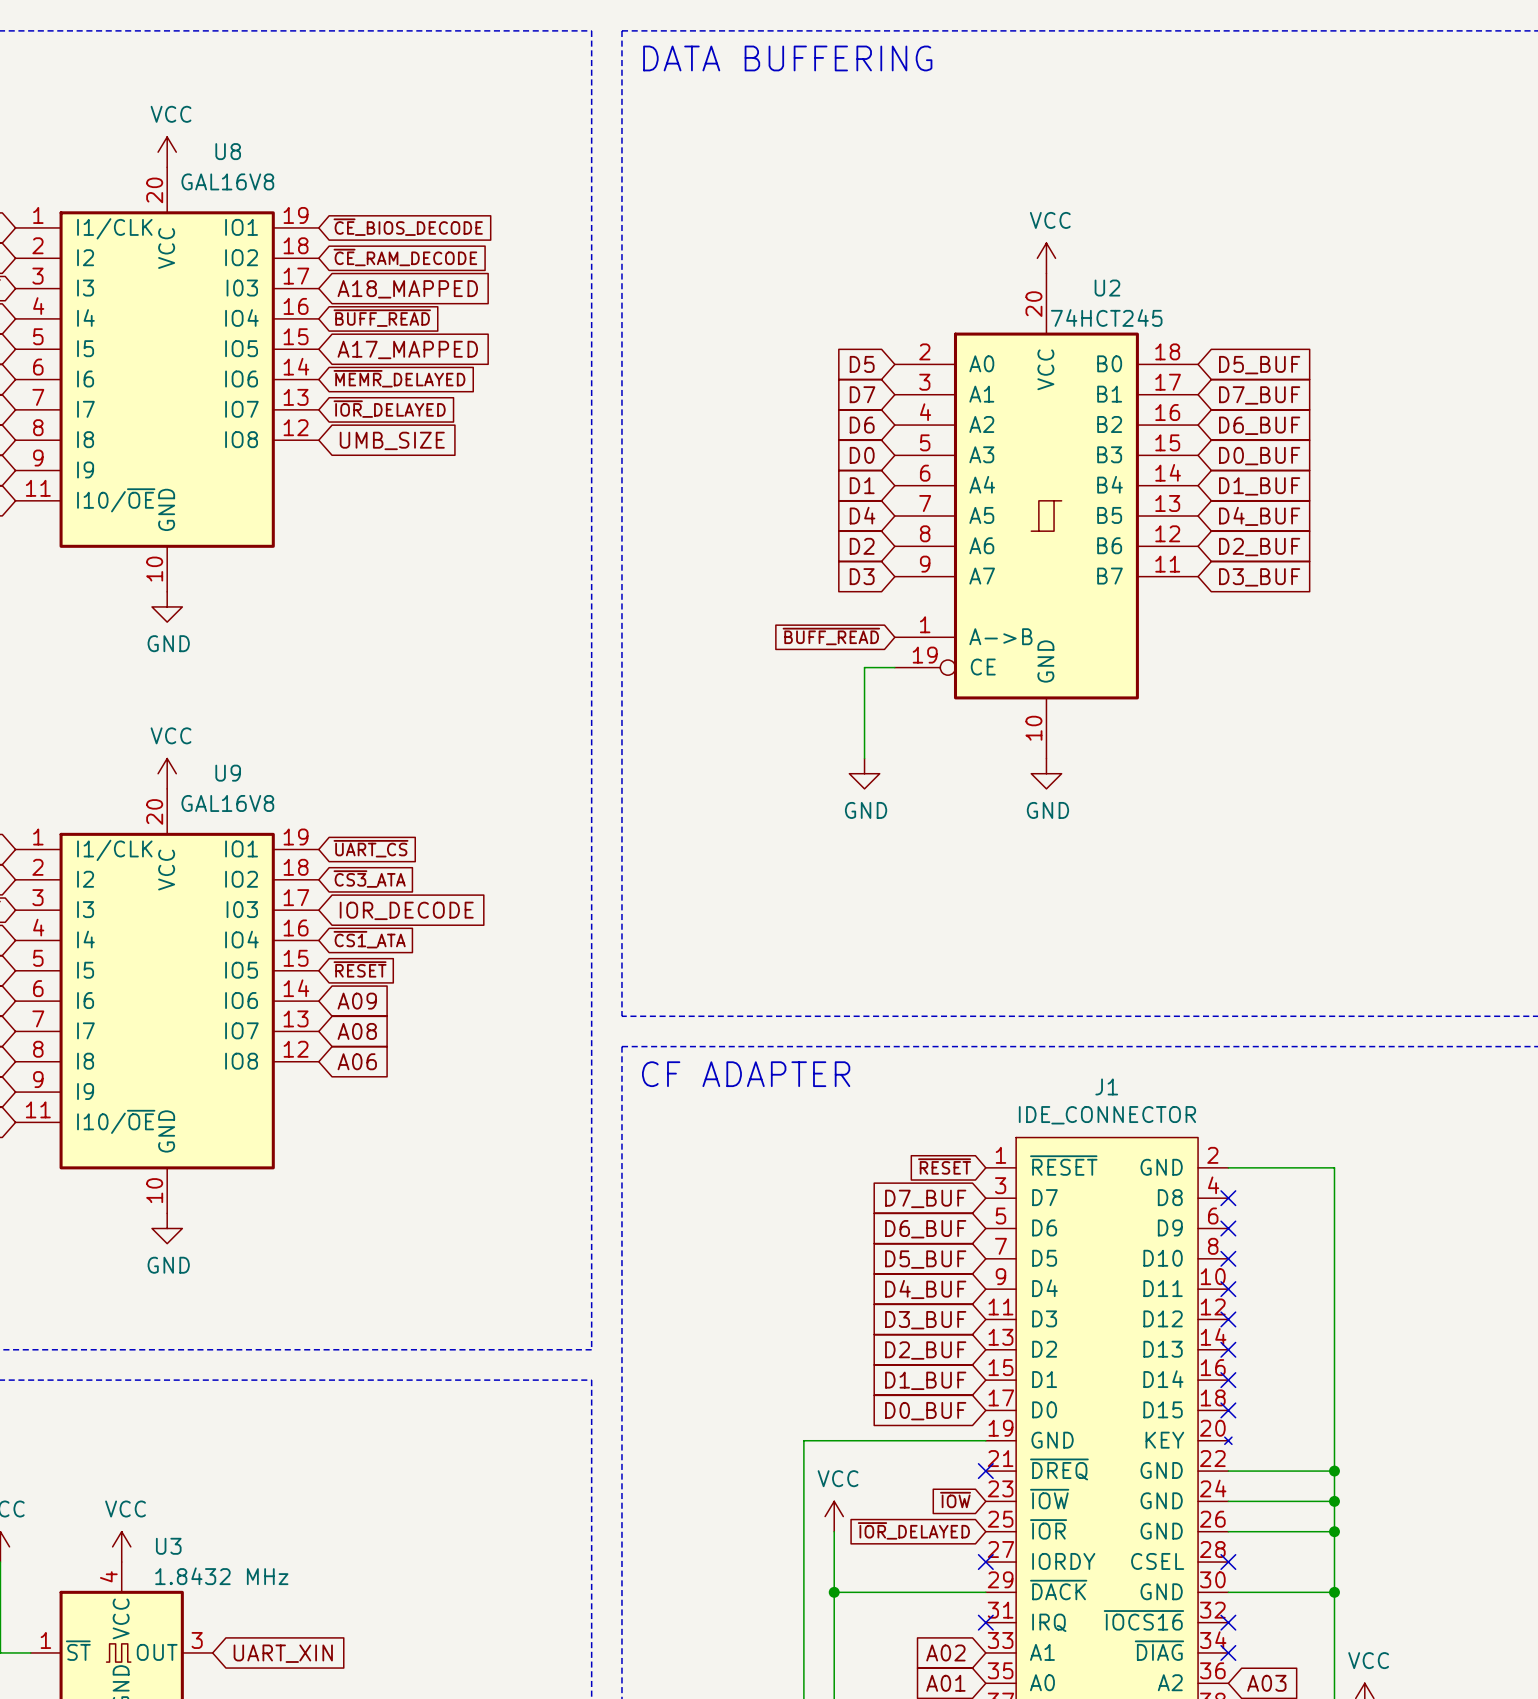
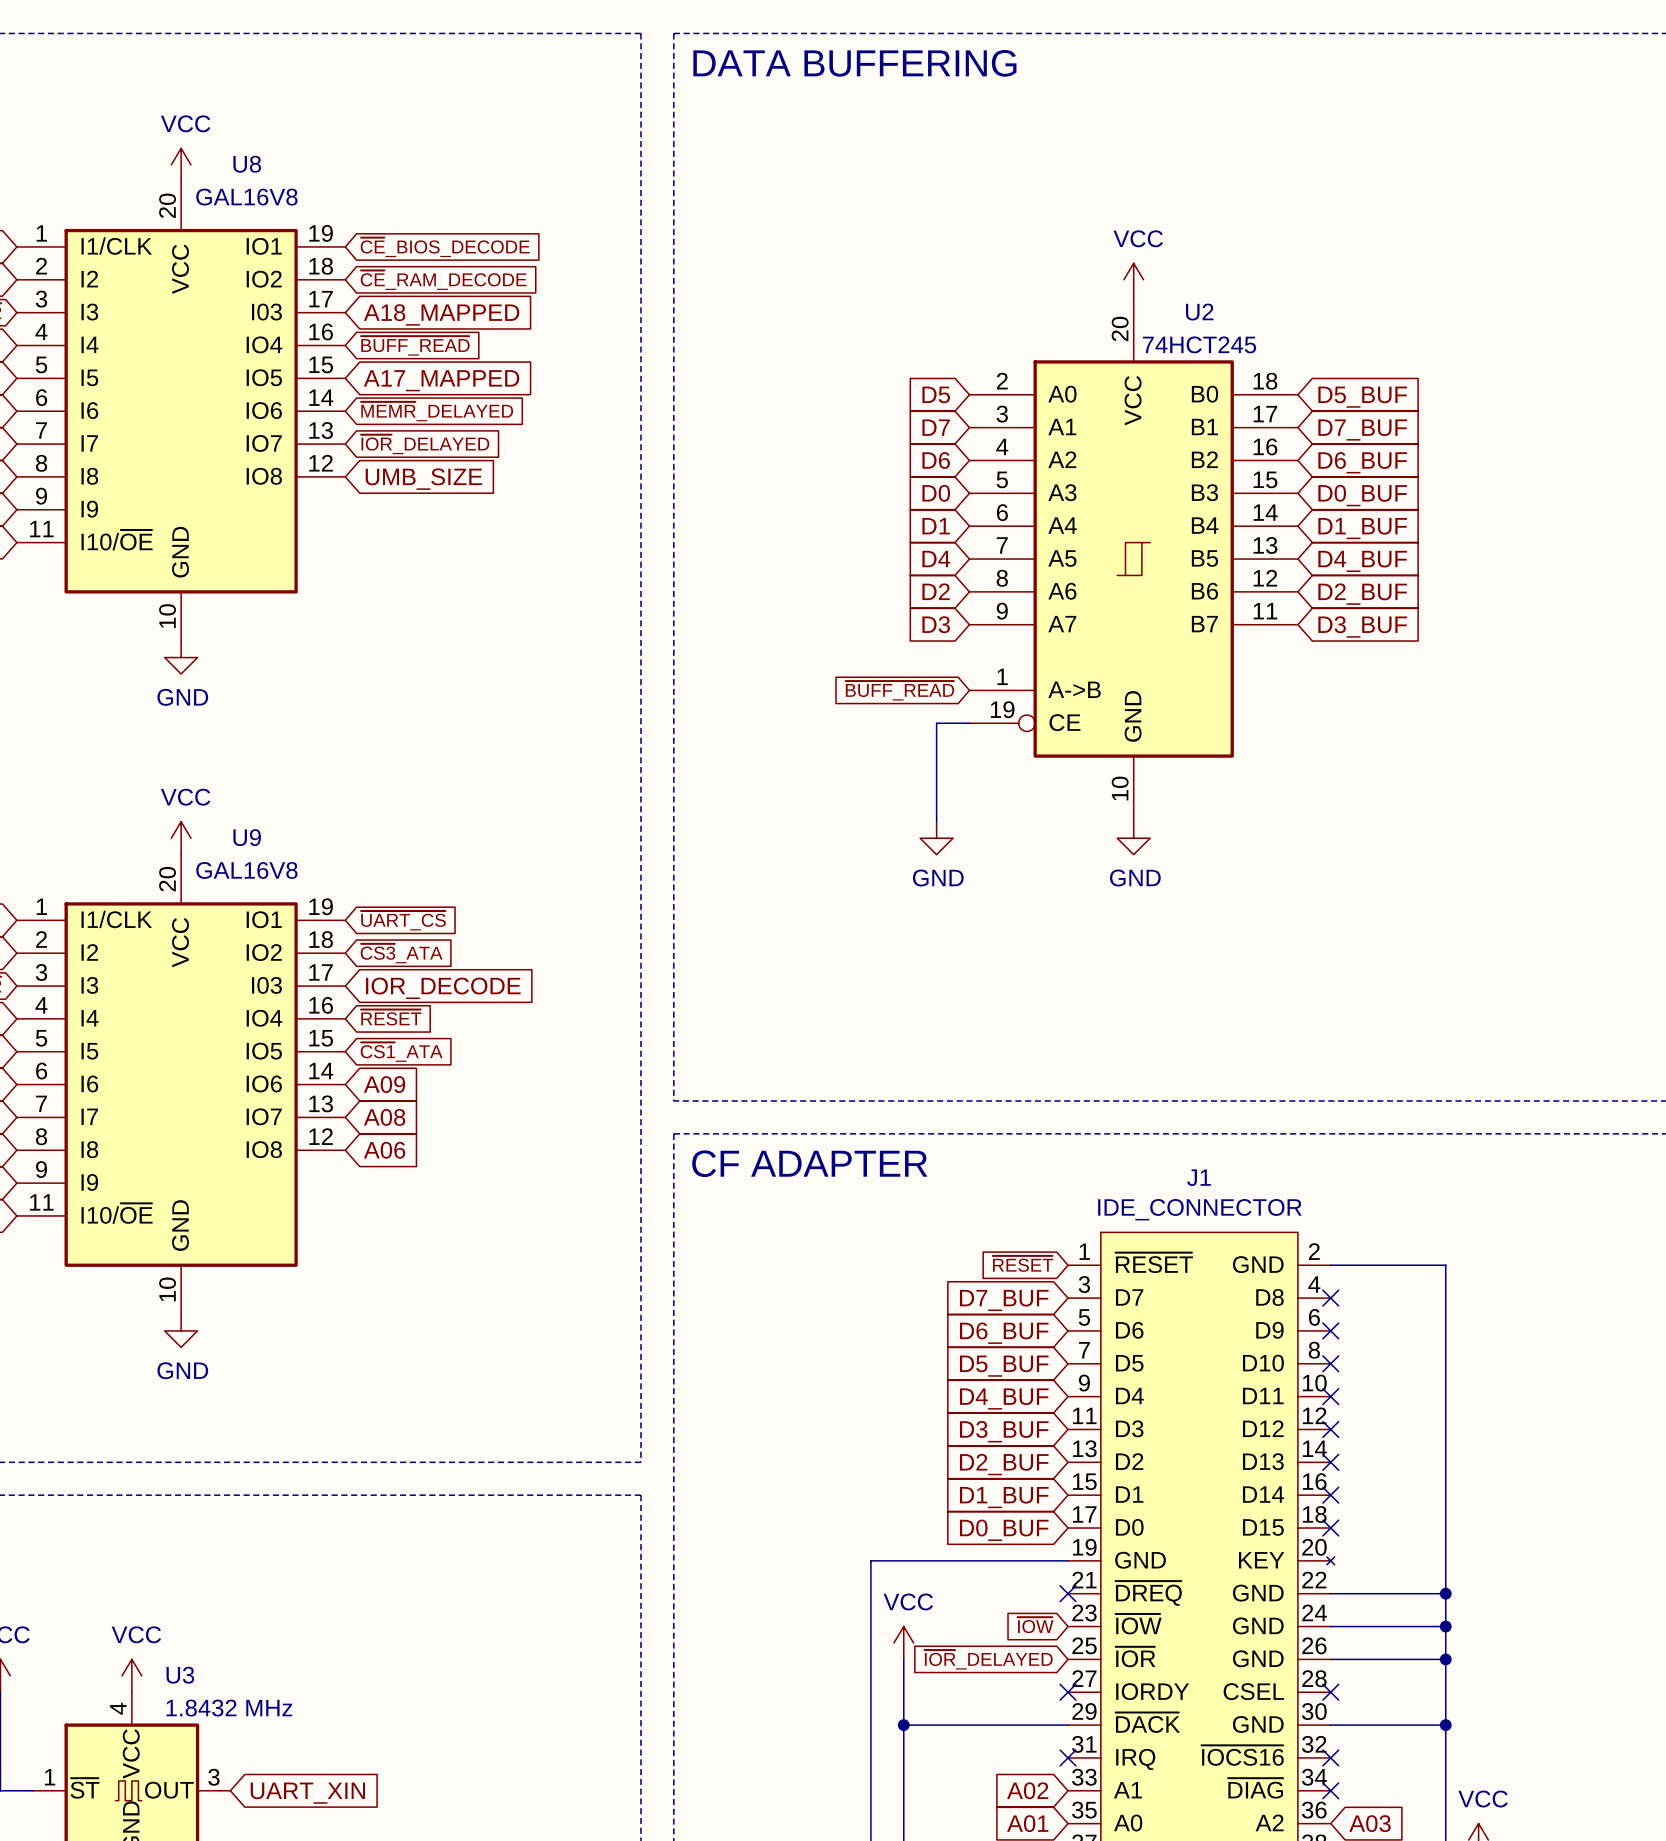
global label: ~{CS1}_ATA (369, 939) -> ~{RESET} (391, 1017)
global label: ~{RESET} (360, 969) -> ~{CS1}_ATA (401, 1052)

